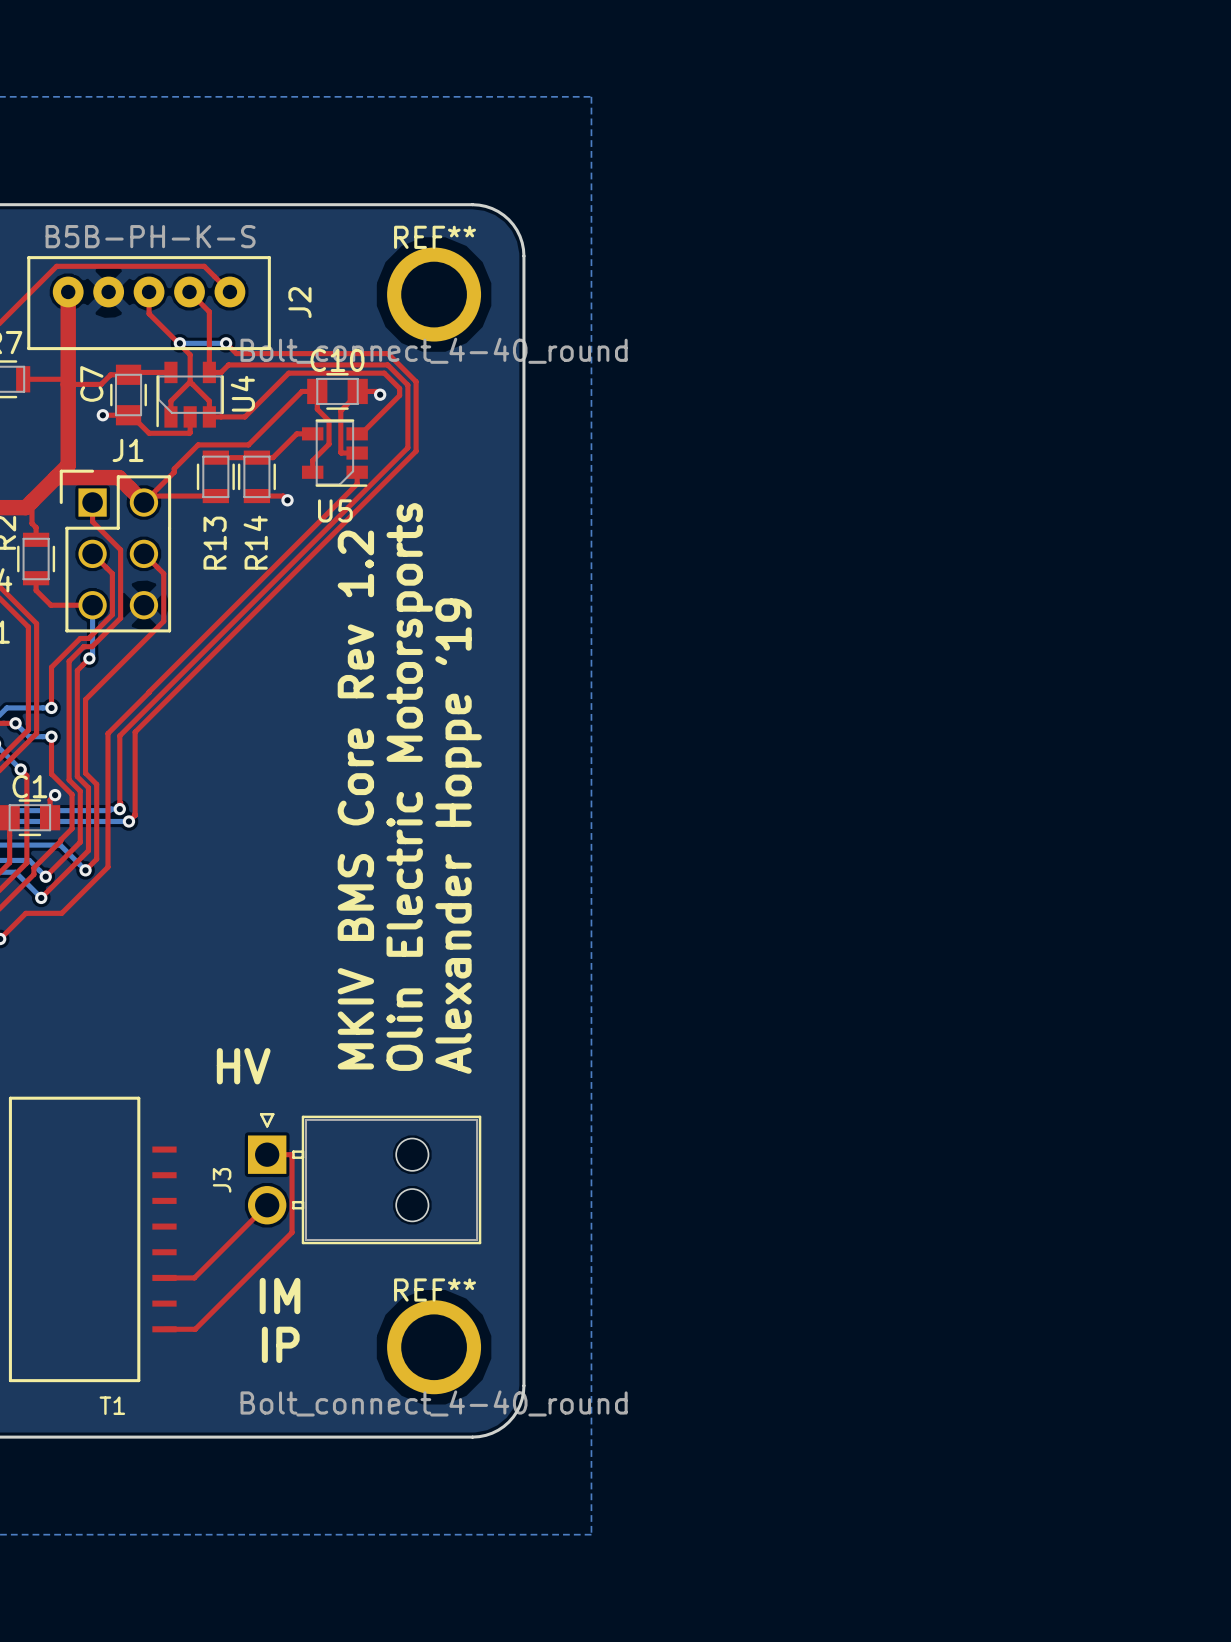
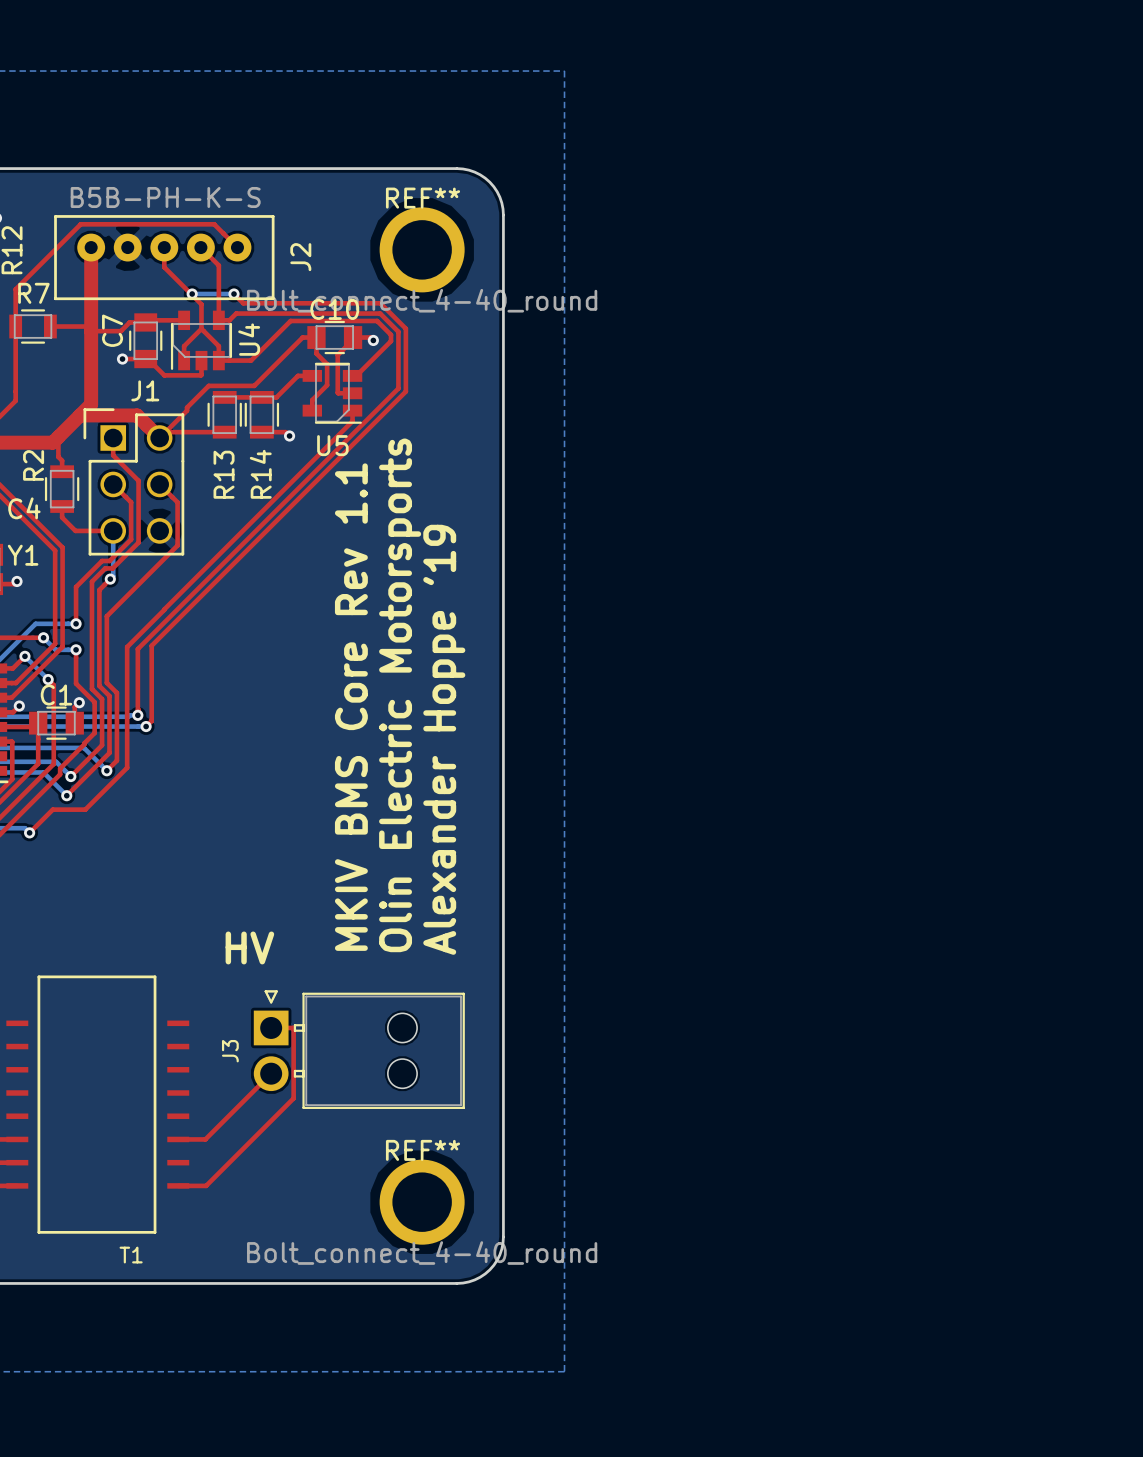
text: MKIV BMS Core Rev 1.2 (355, 800) -> MKIV BMS Core Rev 1.1 (351, 707)
text: IM (280, 1296) -> none
text: IP (280, 1344) -> none

